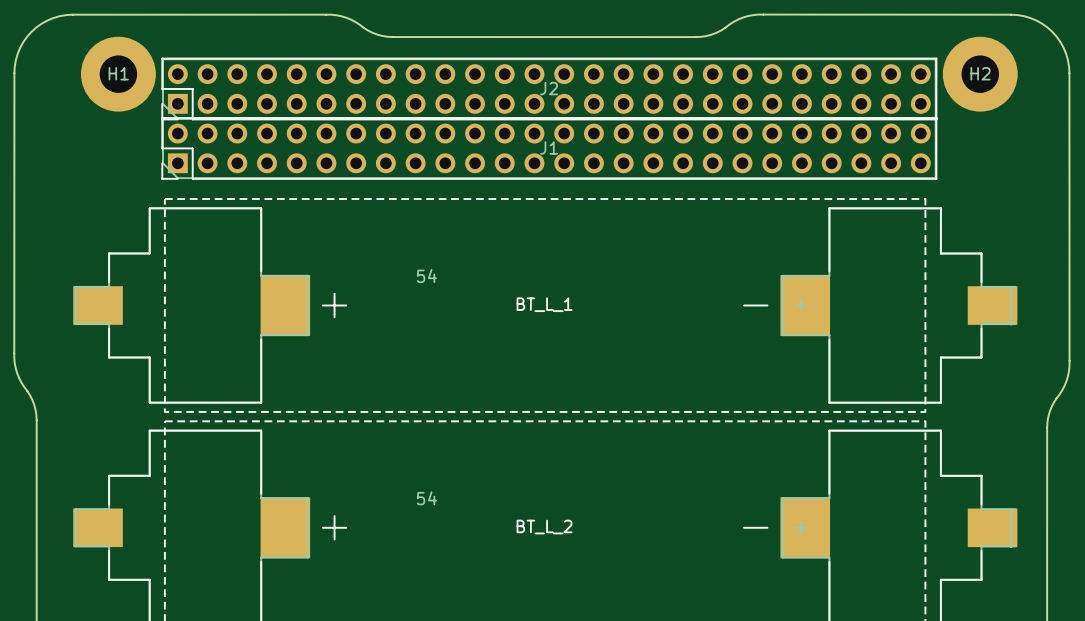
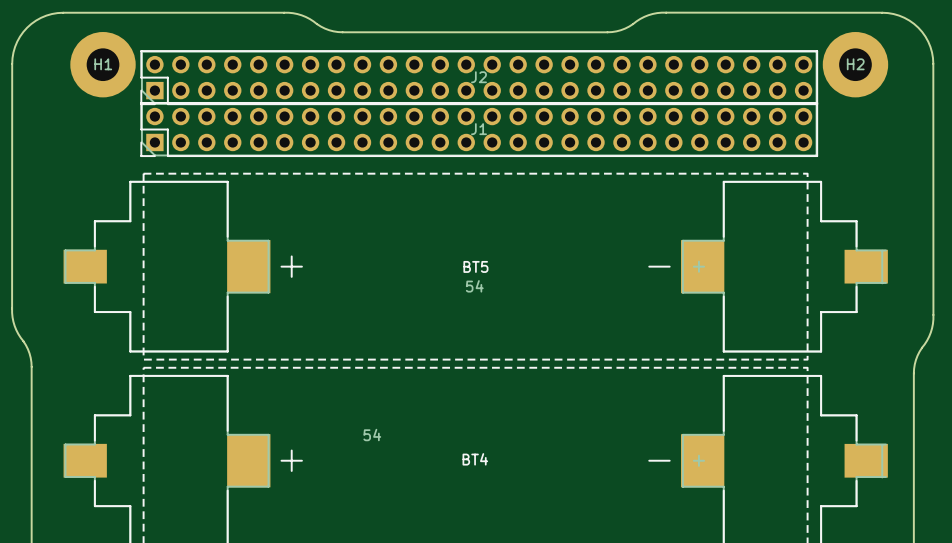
BT_L_1 value position: 54 (426, 276) -> 54 (474, 286)
BT_L_1 name: BT_L_1 (544, 304) -> BT5 (475, 266)
BT_L_2 name: BT_L_2 (544, 527) -> BT4 (475, 459)

